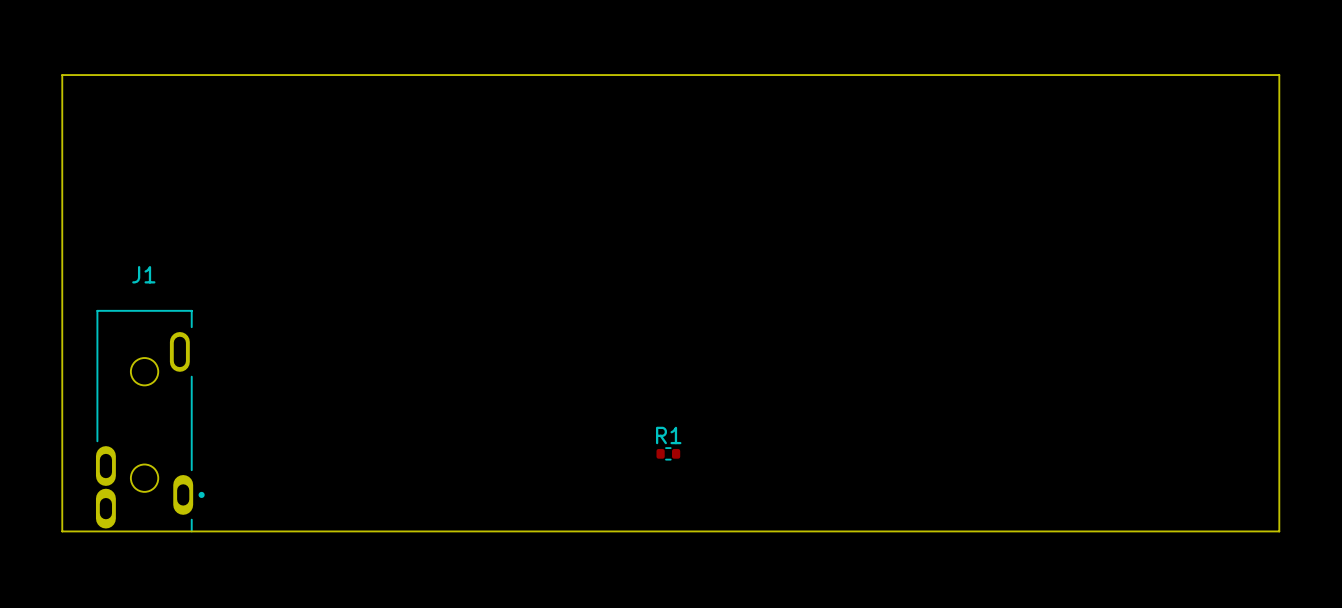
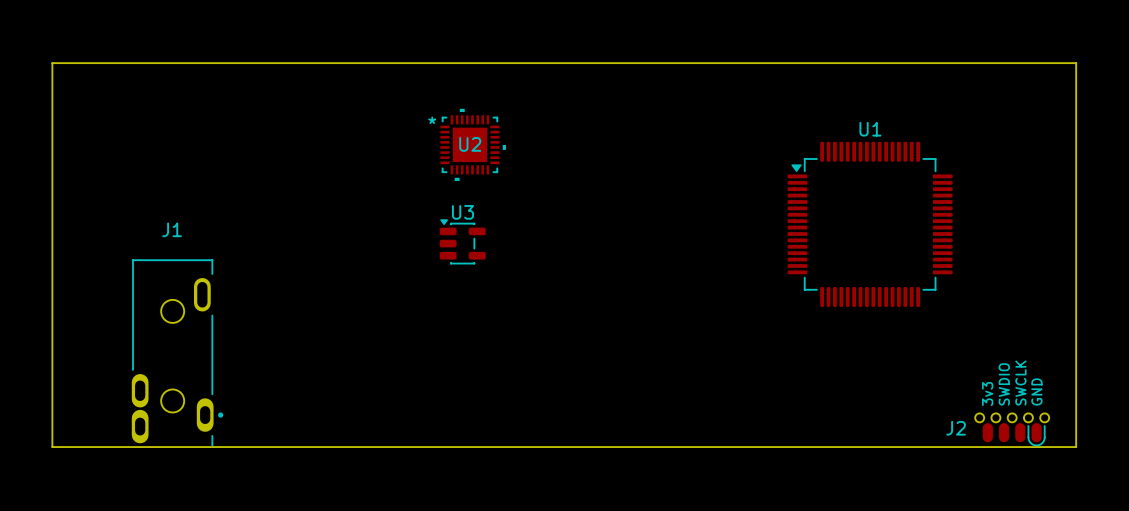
U2: none -> (473, 144)
U1: none -> (870, 224)
U3: none -> (462, 241)
J1 position: (150, 421) -> (177, 352)
R1: (668, 453) -> none
text: none -> SWCLK (1020, 383)
text: none -> SWDIO (1004, 384)
text: none -> GND (1036, 391)
text: none -> 3v3 (987, 394)
J2: none -> (1012, 429)

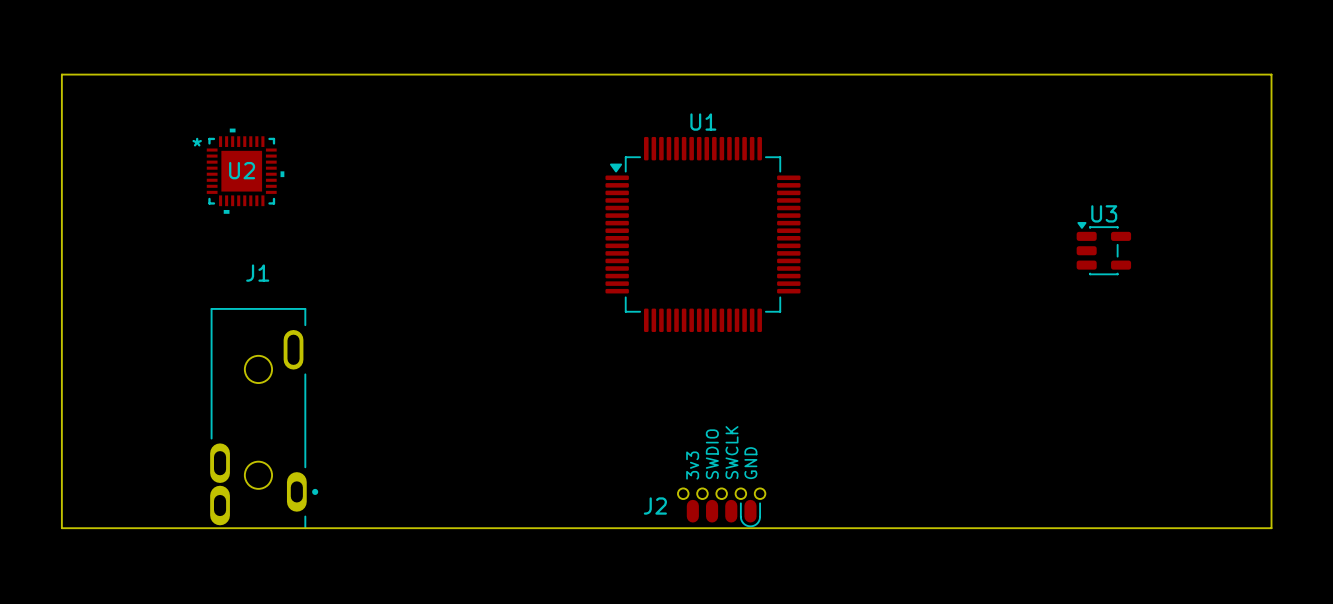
U2 position: (473, 144) -> (245, 171)
U1 position: (870, 224) -> (702, 234)
U3 position: (462, 241) -> (1103, 248)
J1 position: (177, 352) -> (264, 418)
text: none -> SWCLK (731, 452)
text: SWCLK (1020, 383) -> none
text: none -> SWDIO (712, 454)
text: SWDIO (1004, 384) -> none
text: none -> GND (750, 463)
text: GND (1036, 391) -> none
text: none -> 3v3 (692, 465)
text: 3v3 (987, 394) -> none
J2 position: (1012, 429) -> (721, 507)

